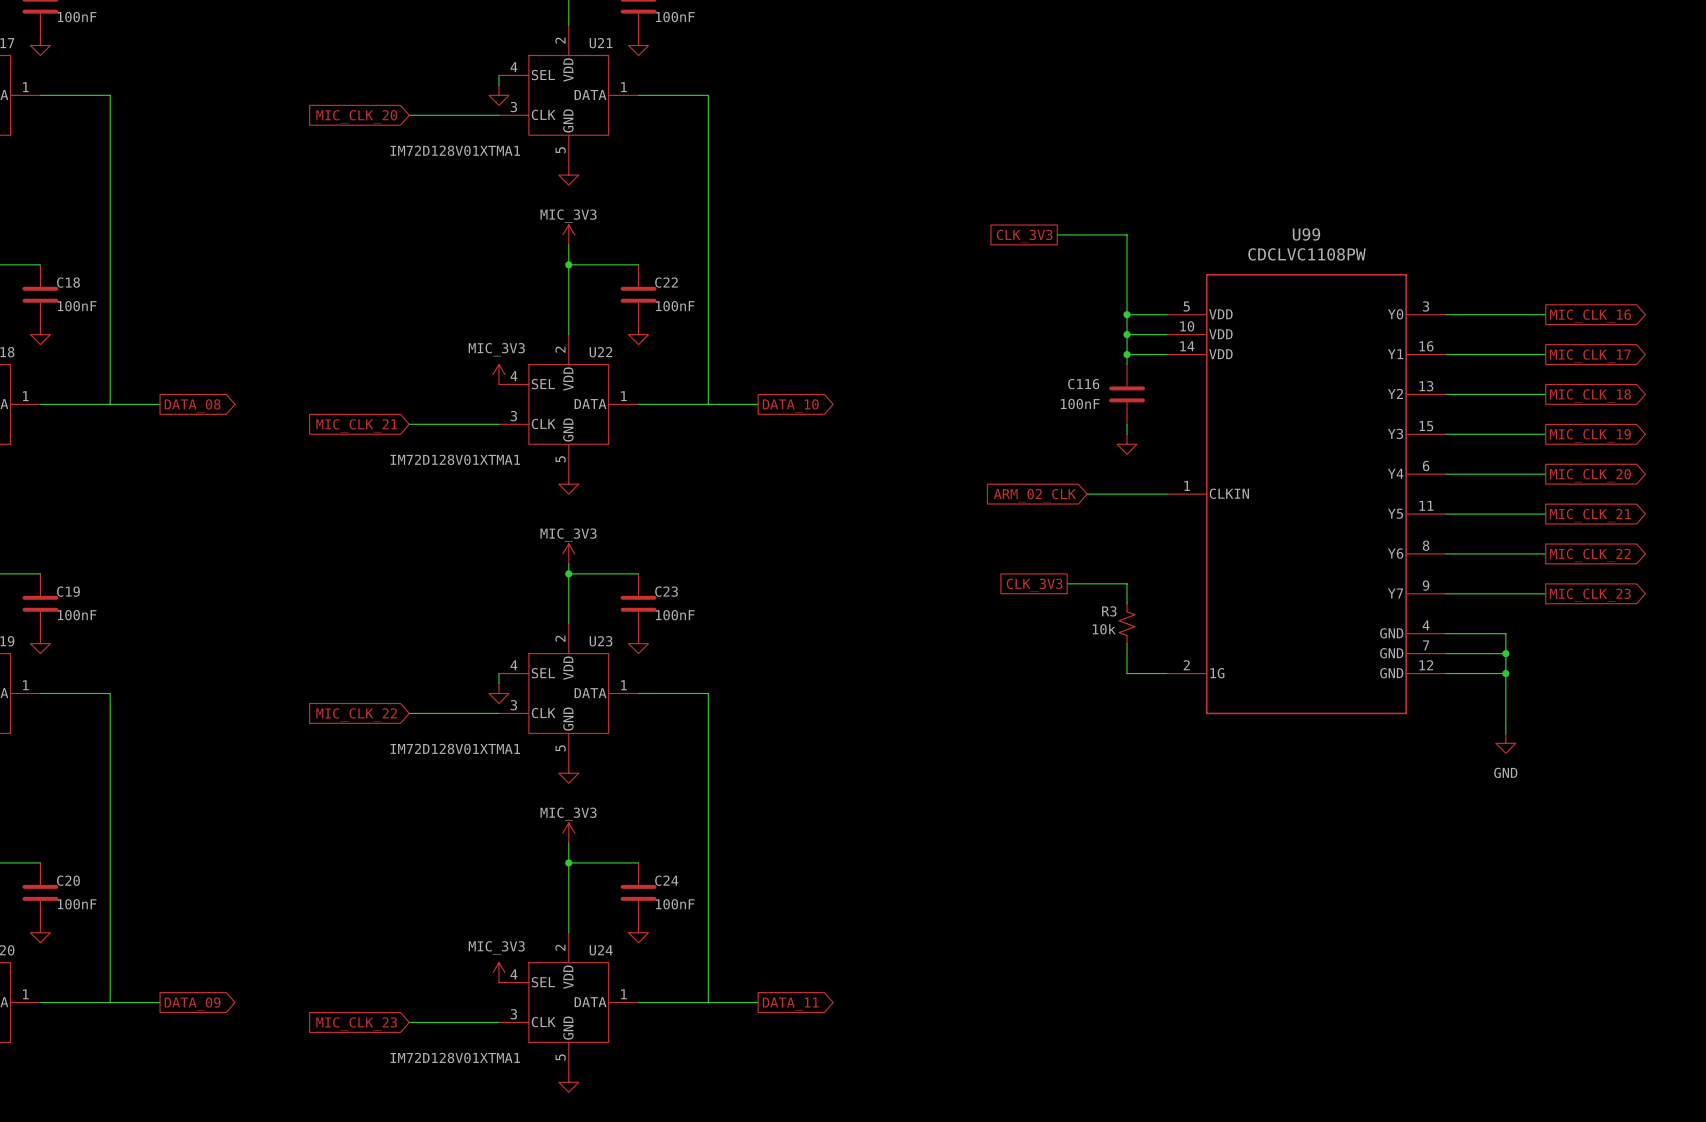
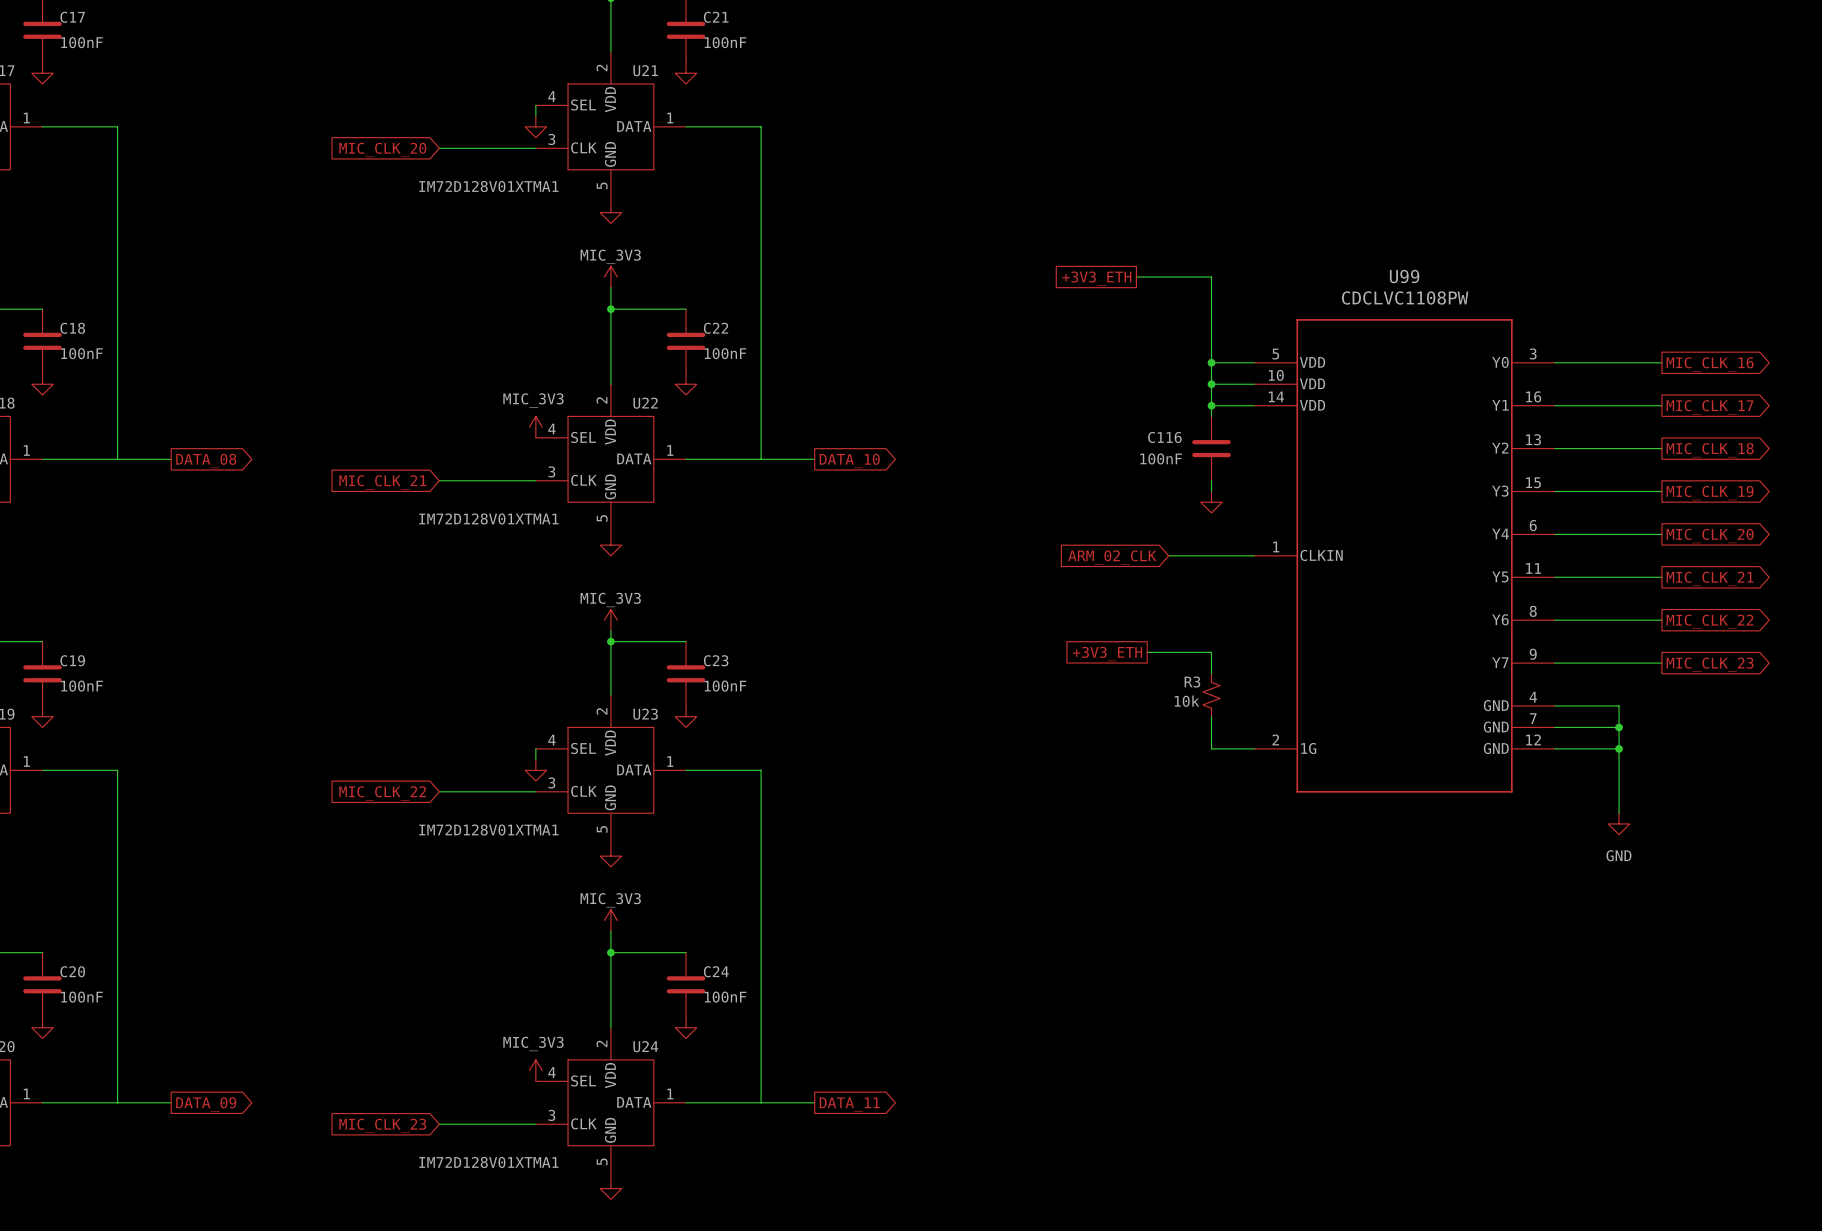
global label: CLK_3V3 (1024, 236) -> +3V3_ETH (1096, 278)
global label: CLK_3V3 (1034, 585) -> +3V3_ETH (1107, 654)

